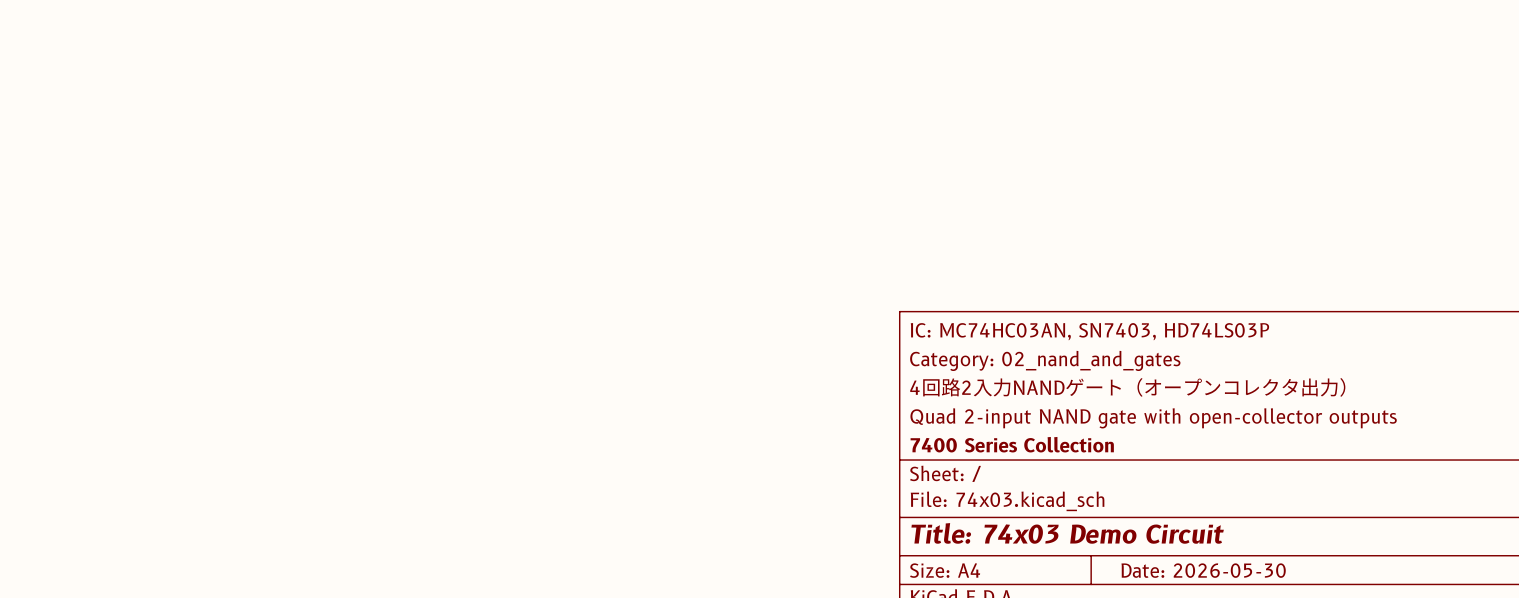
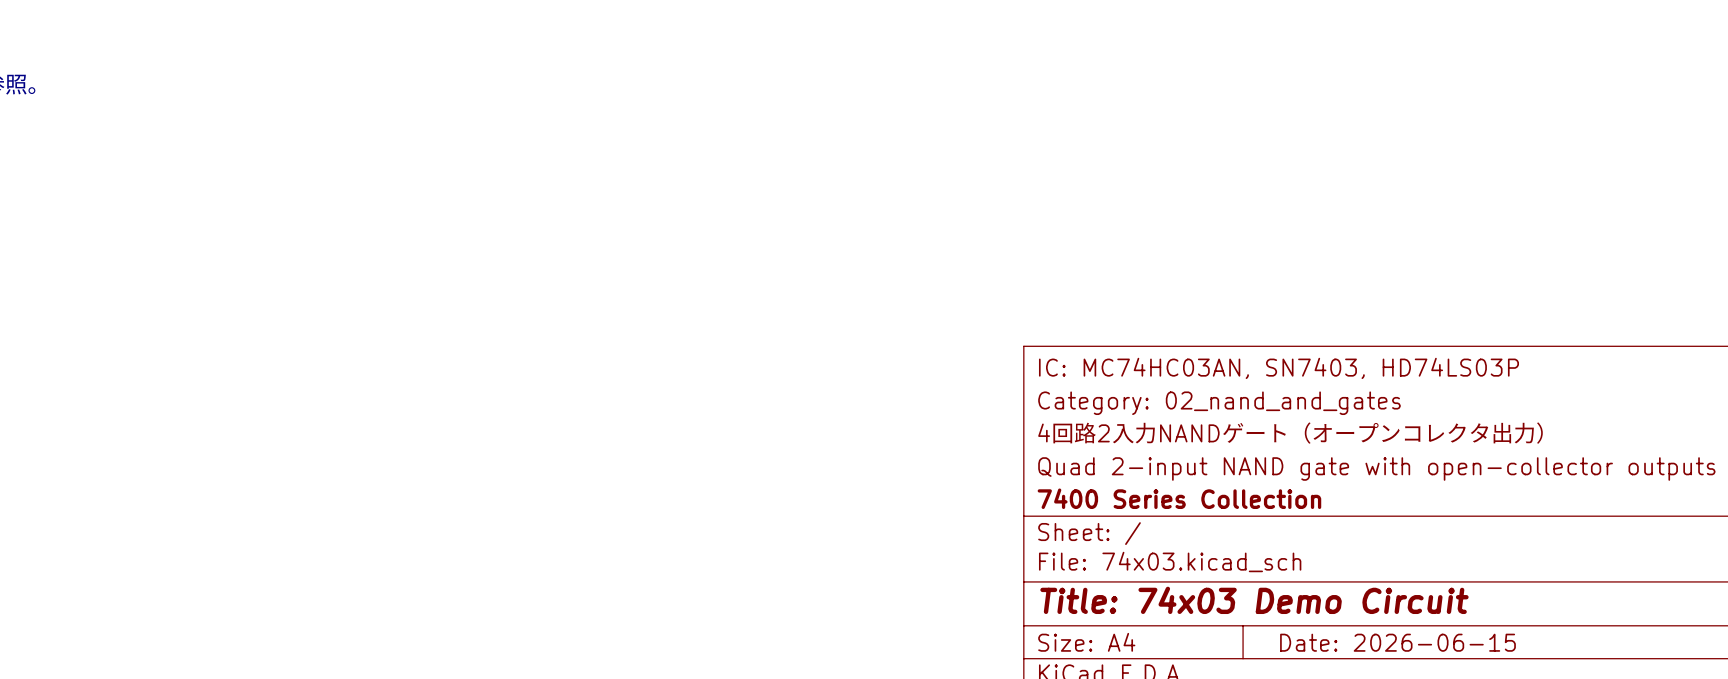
title block: Date: 2026-05-30 (1203, 570) -> Date: 2026-06-15 (1397, 642)

